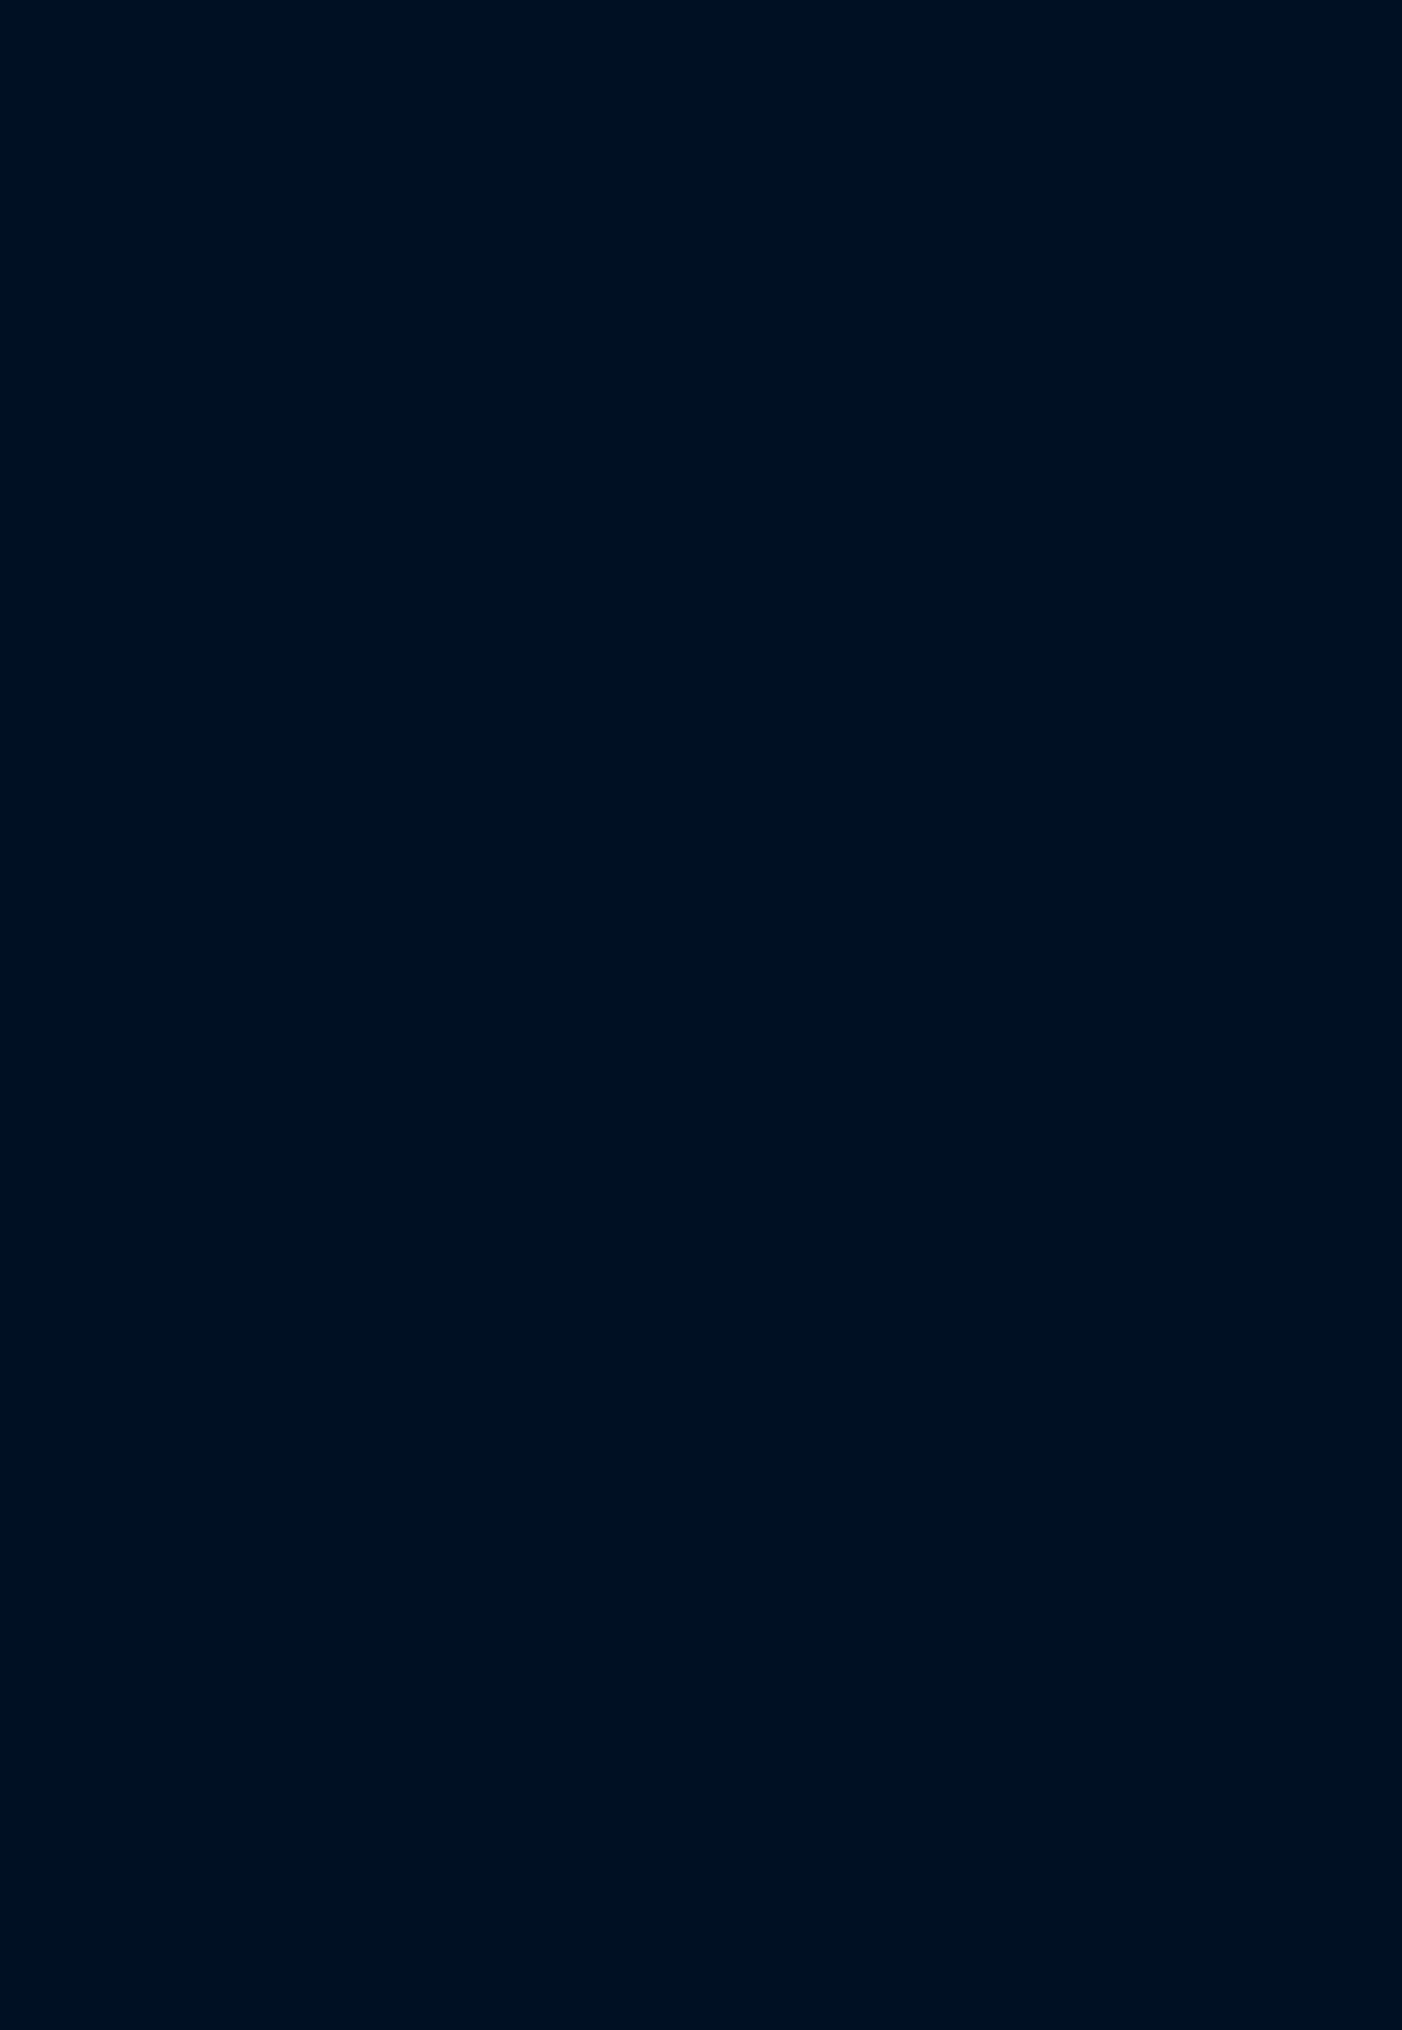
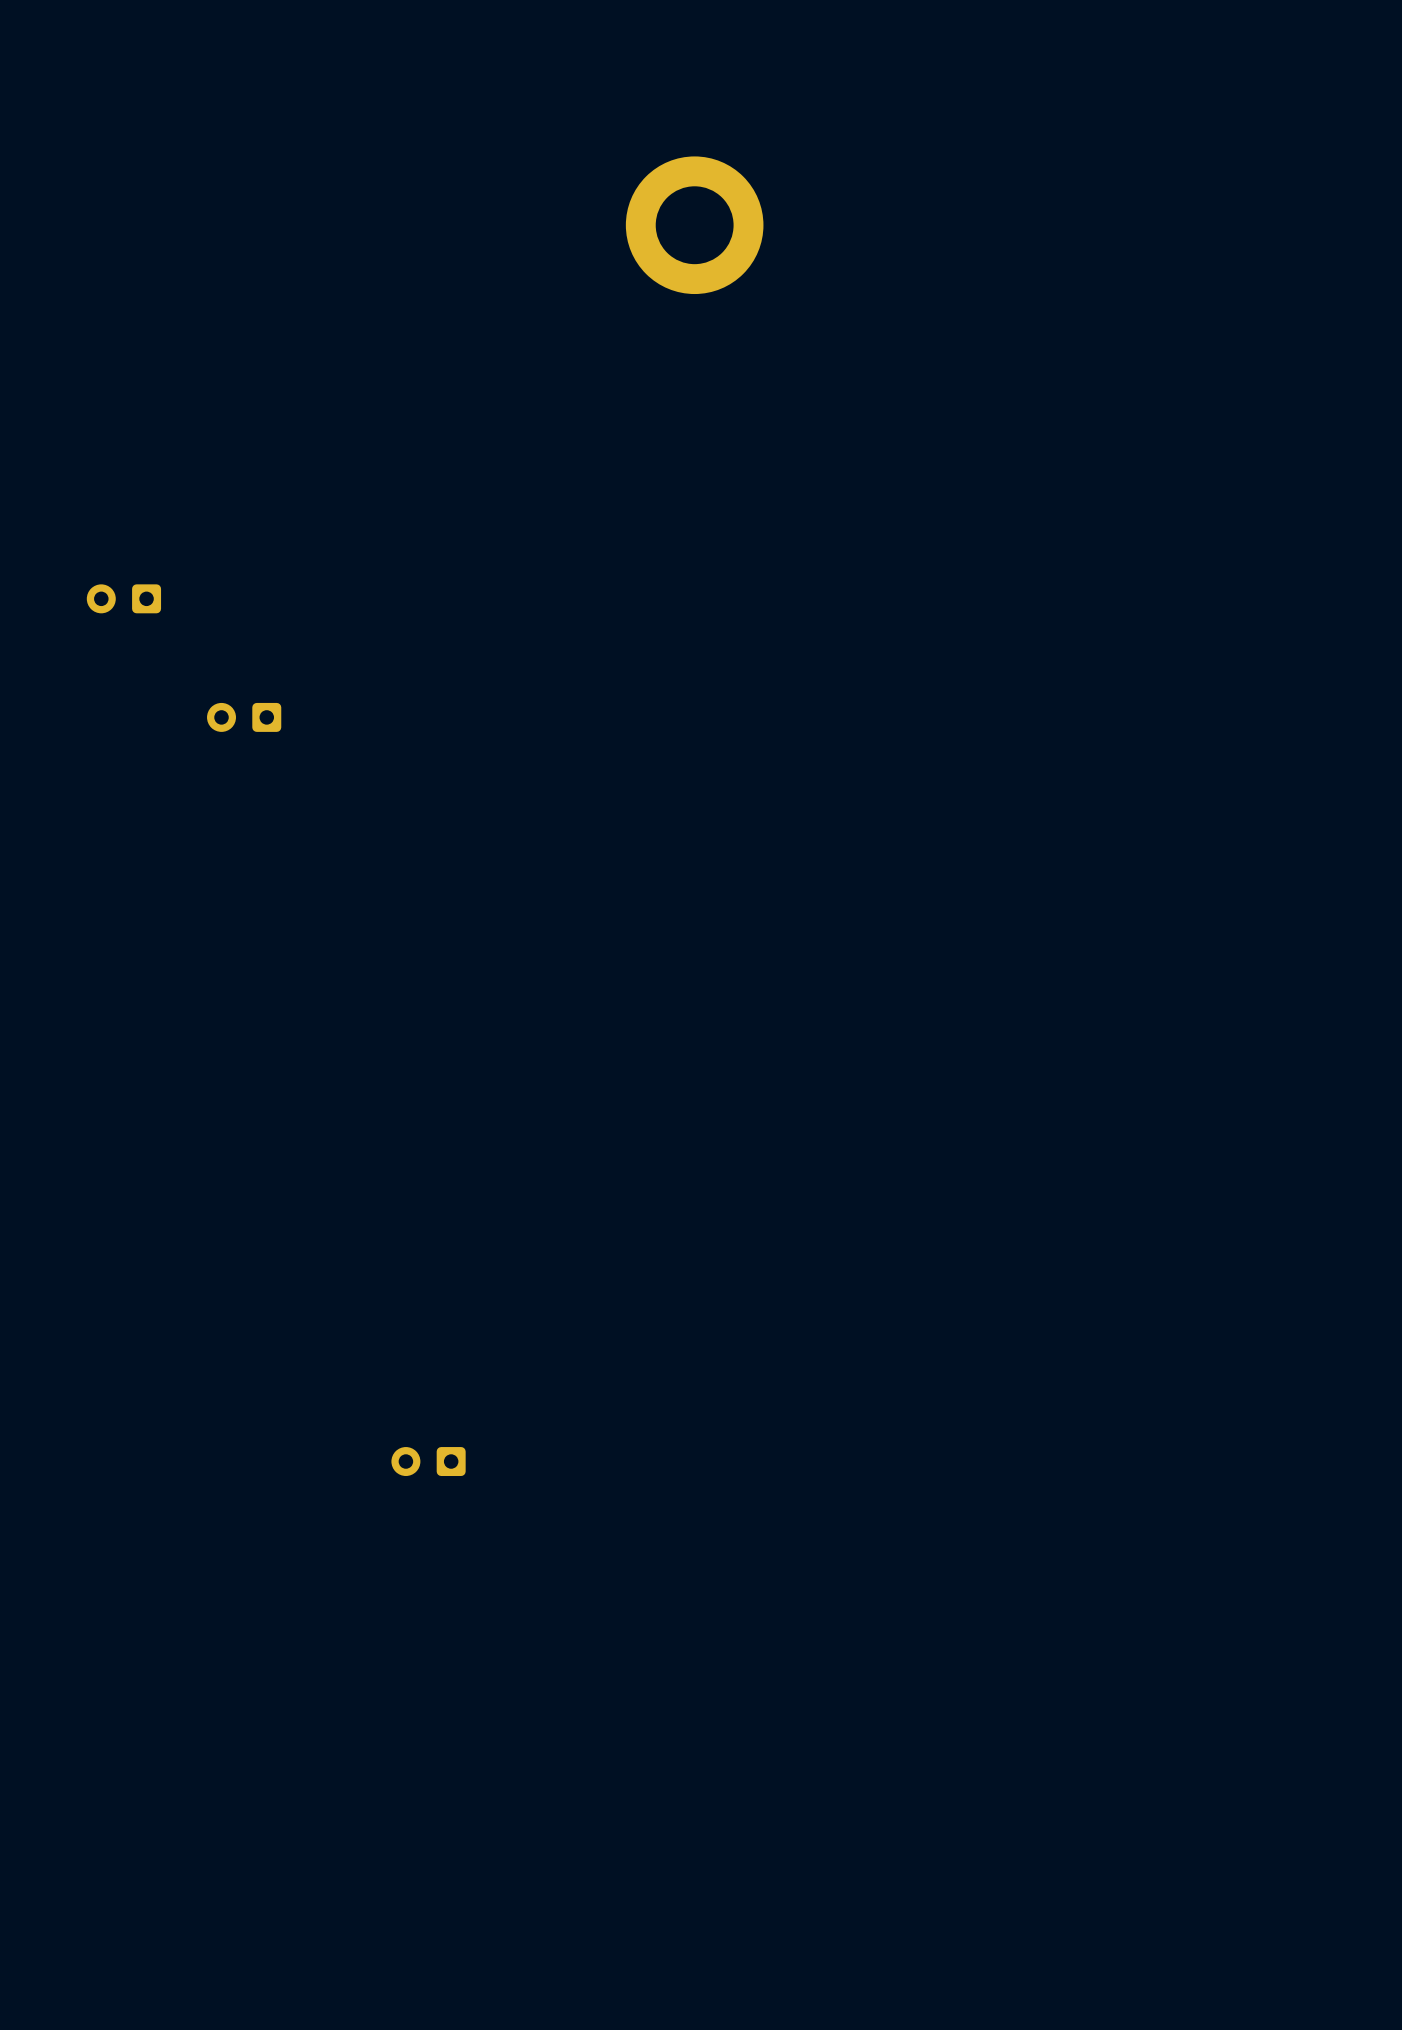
part: none -> (694, 225)
part: none -> (123, 598)
part: none -> (244, 717)
part: none -> (428, 1461)

